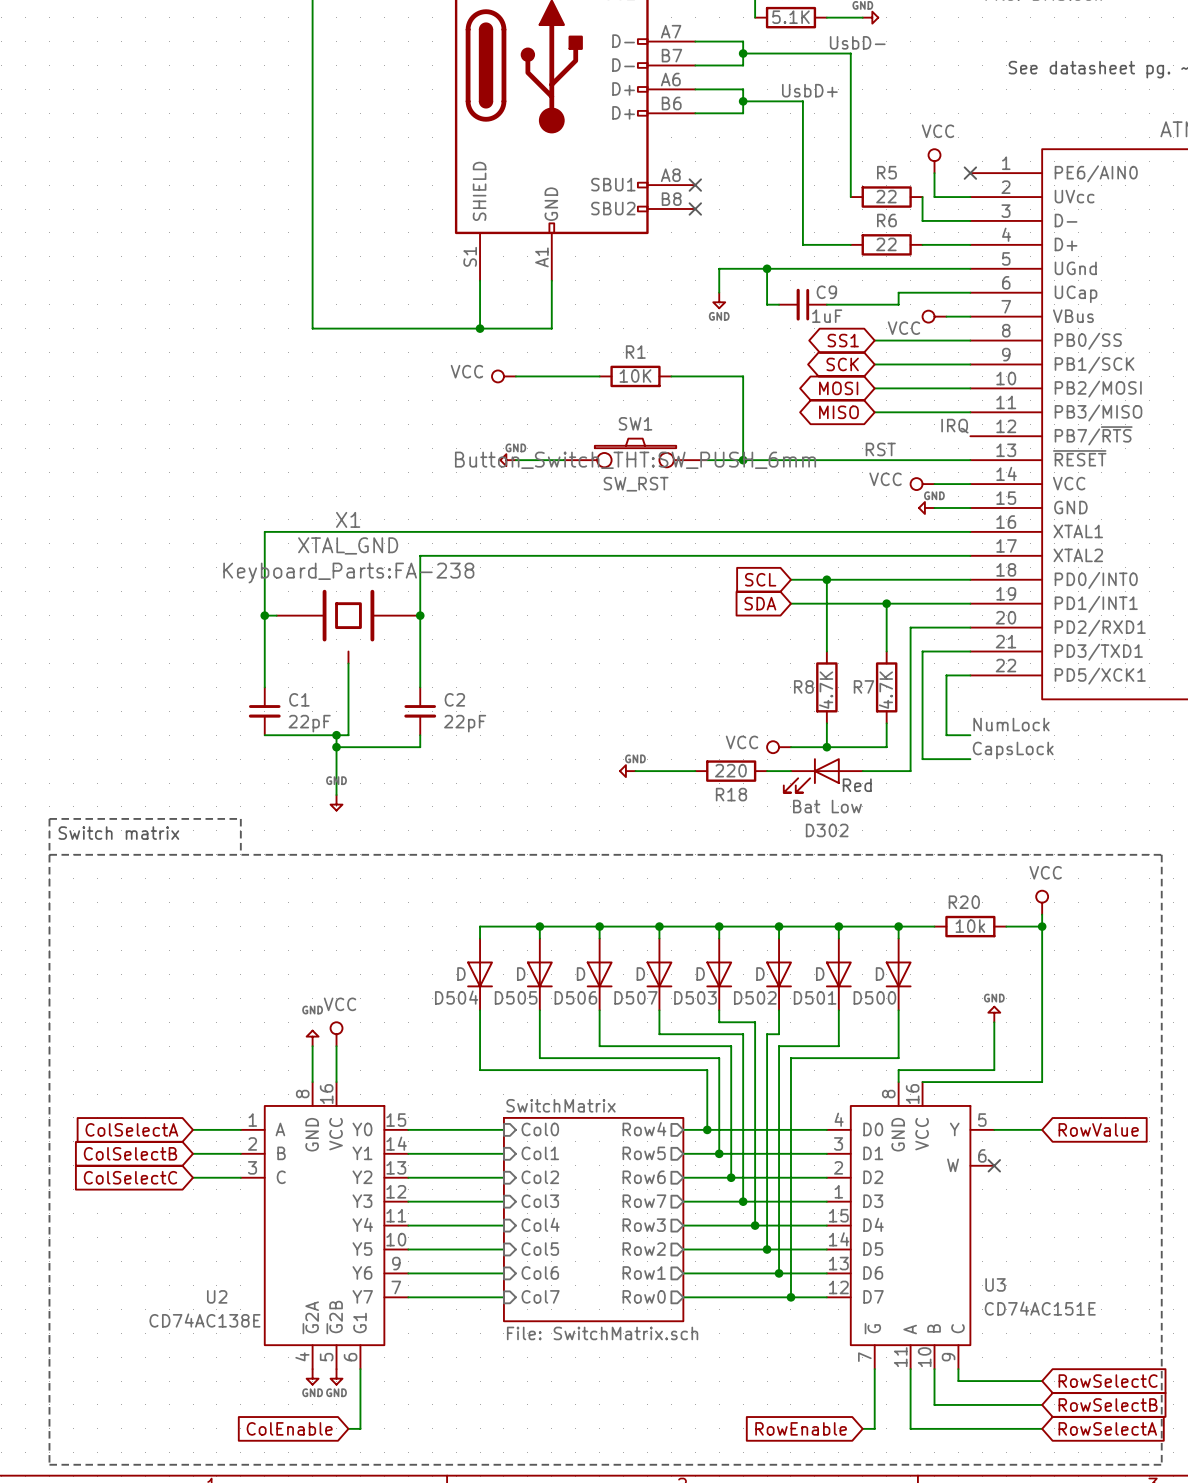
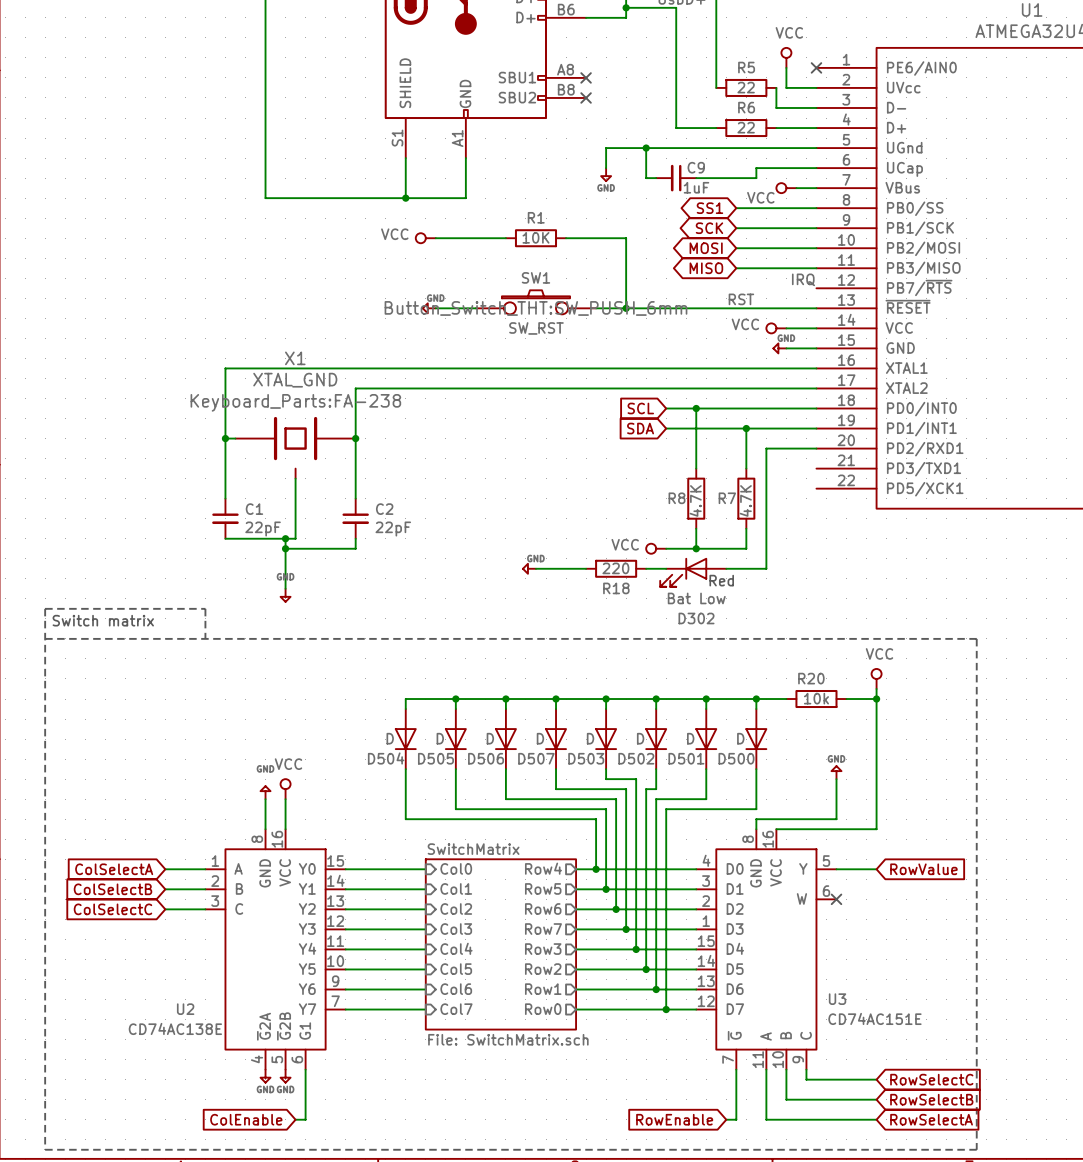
wire: (970, 651) (922, 651) (922, 759) (970, 759) -> none
wire: (970, 675) (946, 675) (946, 735) (970, 735) -> none
label: NumLock (1011, 724) -> none
label: CapsLock (1013, 750) -> none

